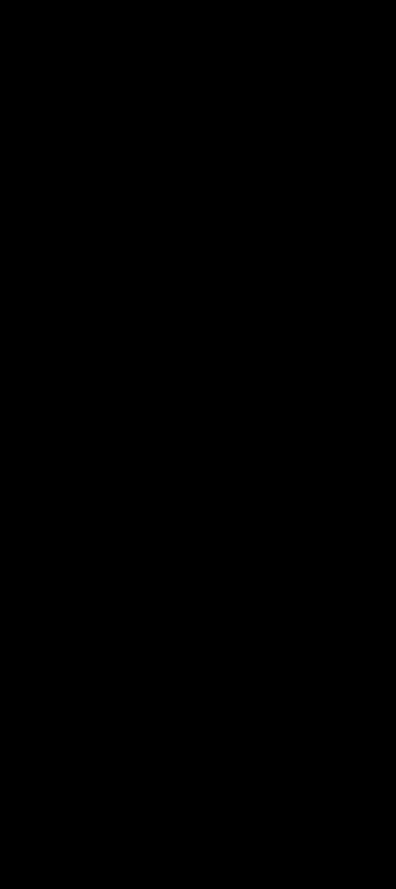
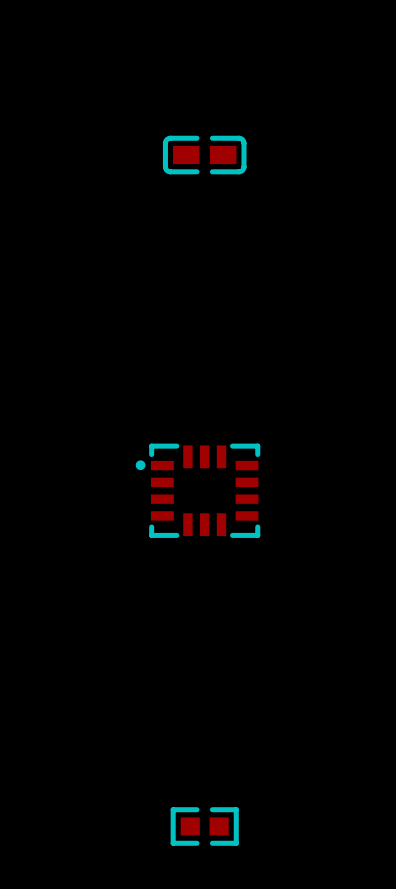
part: none -> (204, 155)
part: none -> (198, 490)
part: none -> (204, 826)

